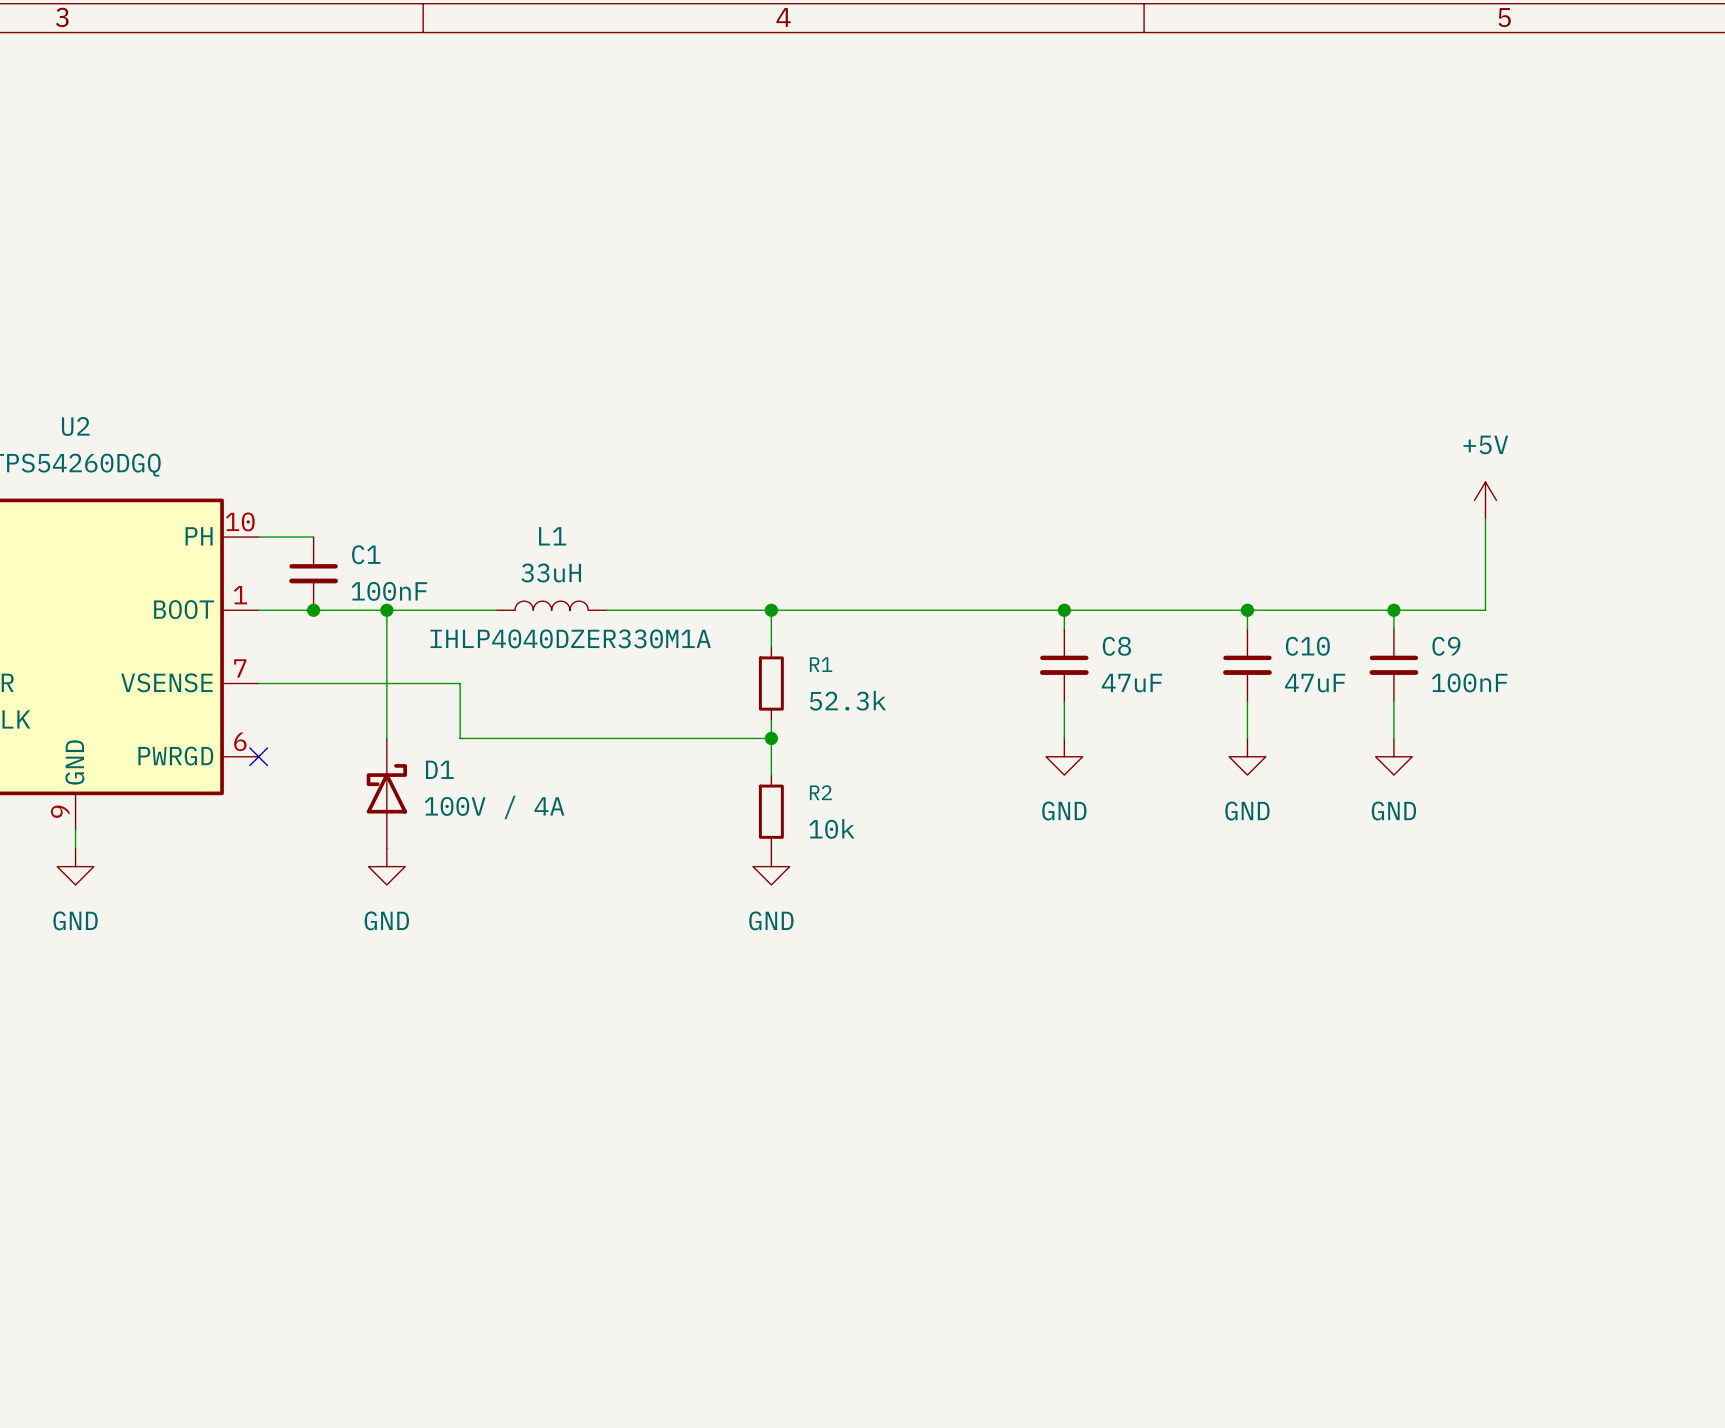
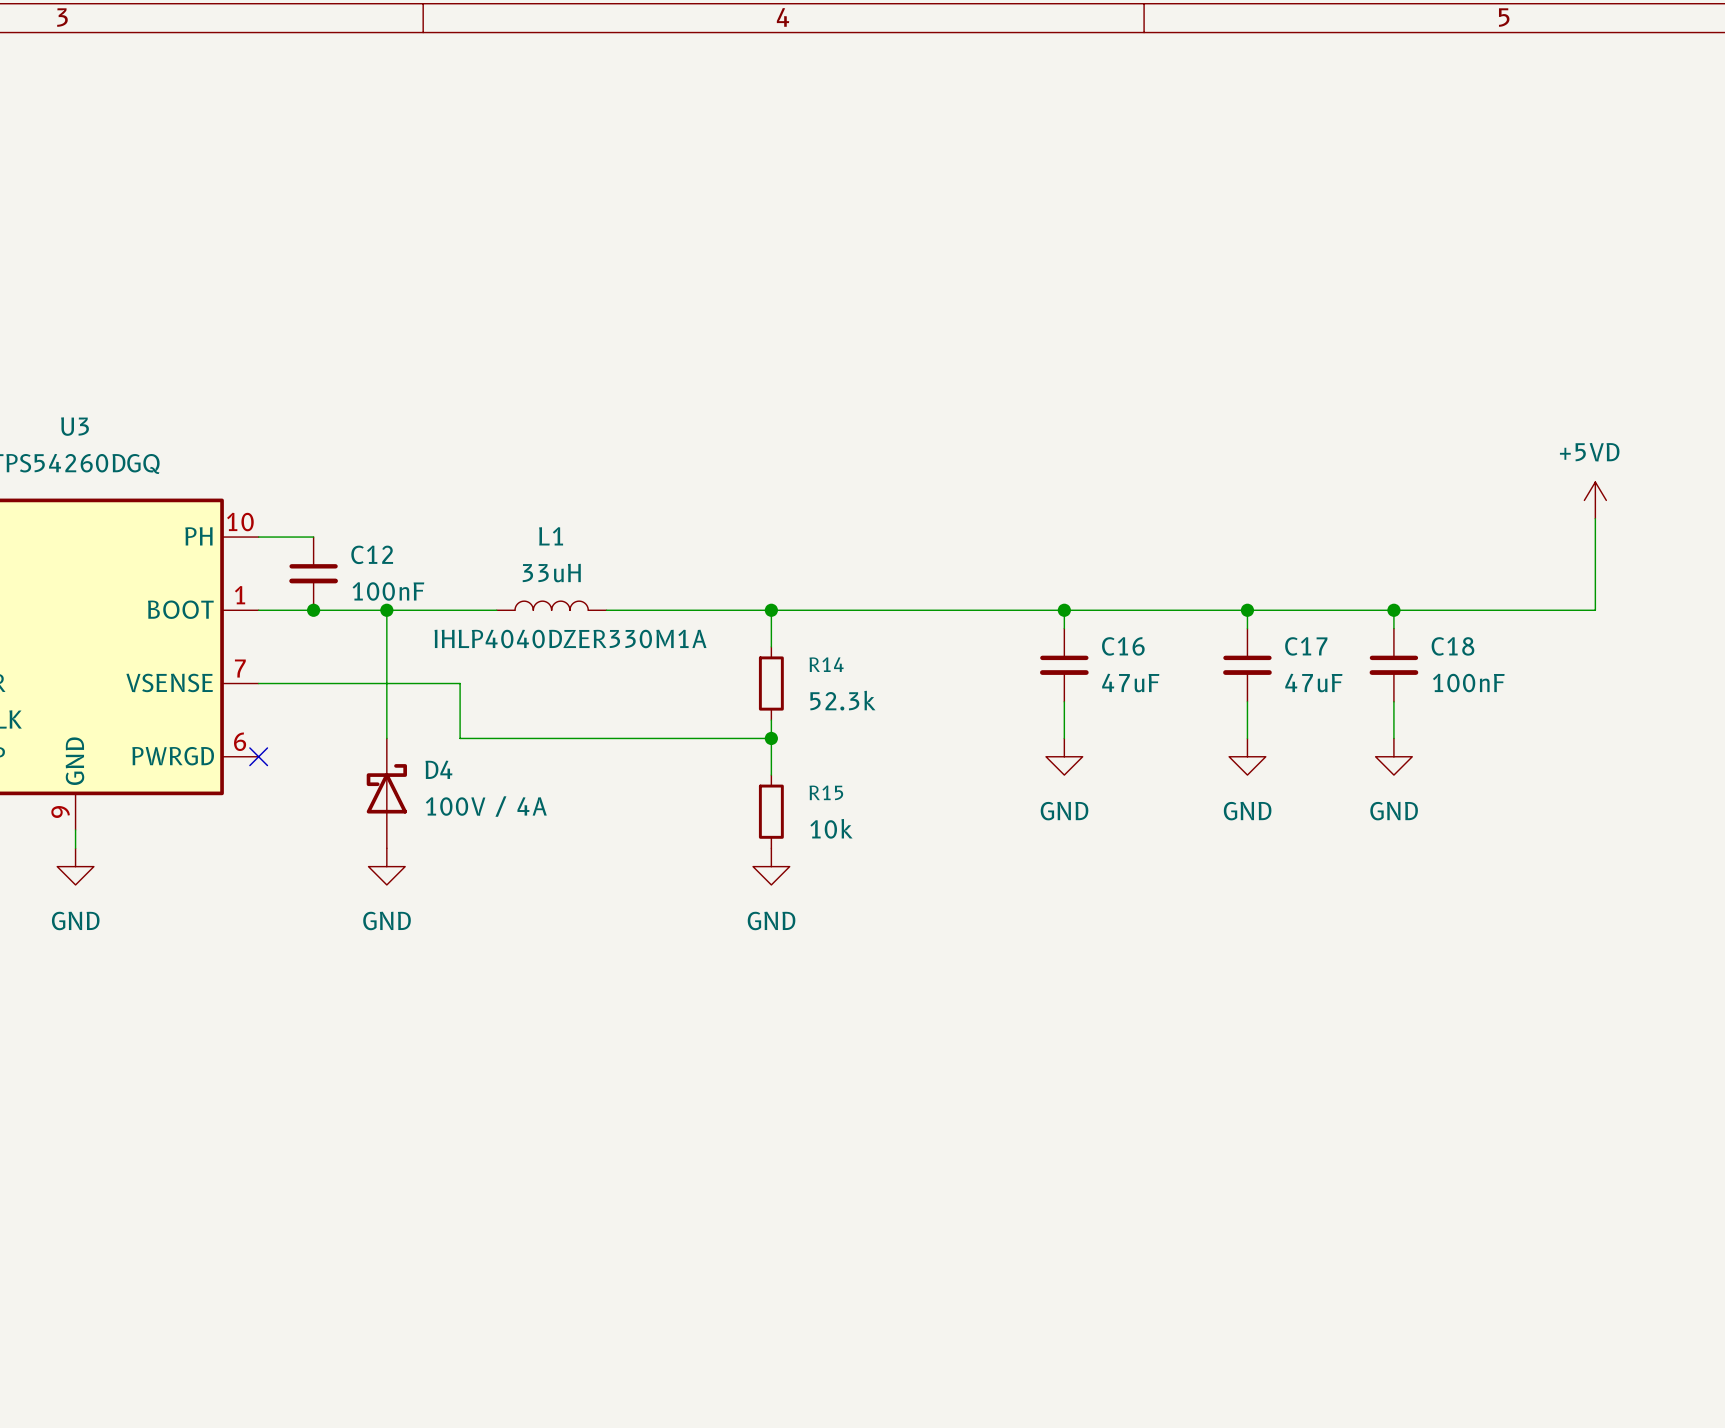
U2 name: U2 (75, 426) -> U3 (75, 426)
power symbol: +5V (1485, 500) -> none
power symbol: none -> +5VD (1595, 500)
wire: (1485, 518) (1485, 610) -> (1595, 518) (1595, 610) (1485, 610)
C1 name: C1 (366, 554) -> C12 (372, 554)
C8 name: C8 (1116, 646) -> C16 (1123, 646)
C10 name: C10 (1307, 646) -> C17 (1306, 646)
C9 name: C9 (1446, 646) -> C18 (1452, 646)
R1 name: R1 (821, 664) -> R14 (826, 664)
D1 name: D1 (439, 769) -> D4 (438, 769)
R2 name: R2 (820, 792) -> R15 (826, 792)

